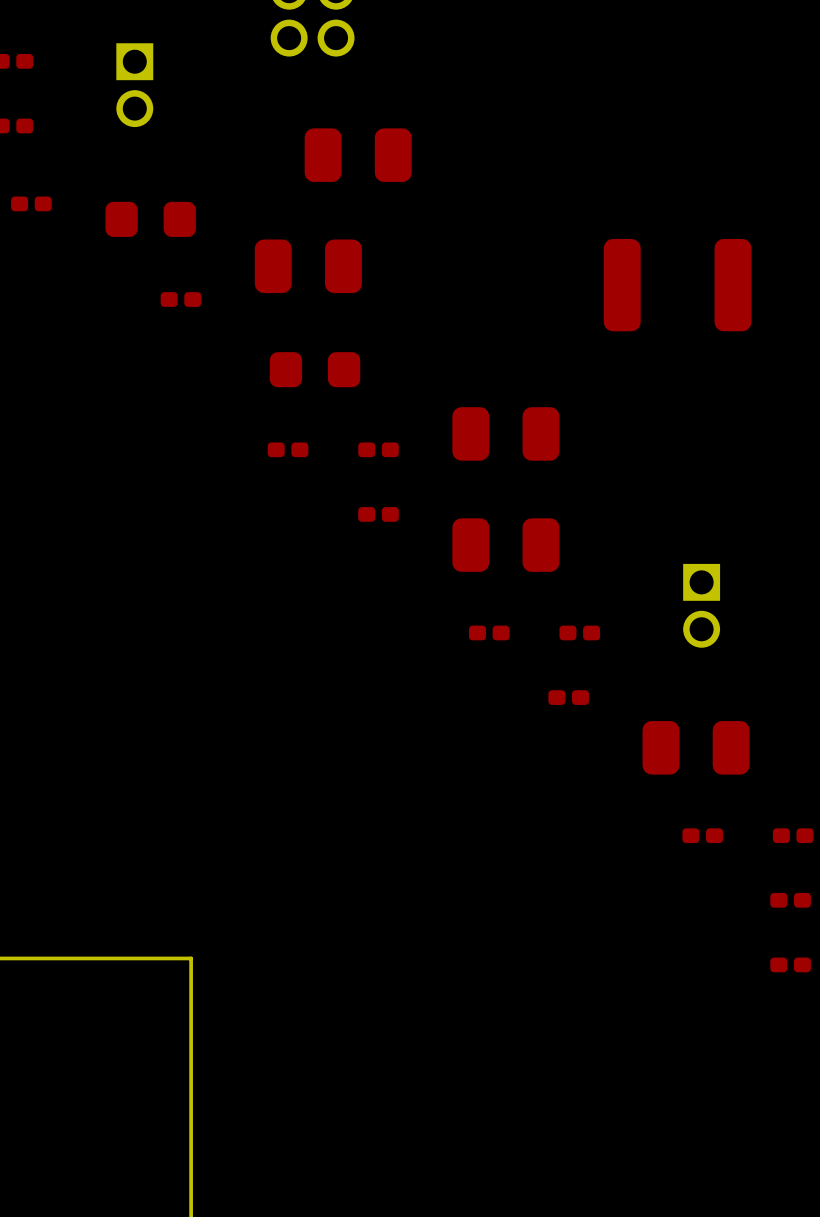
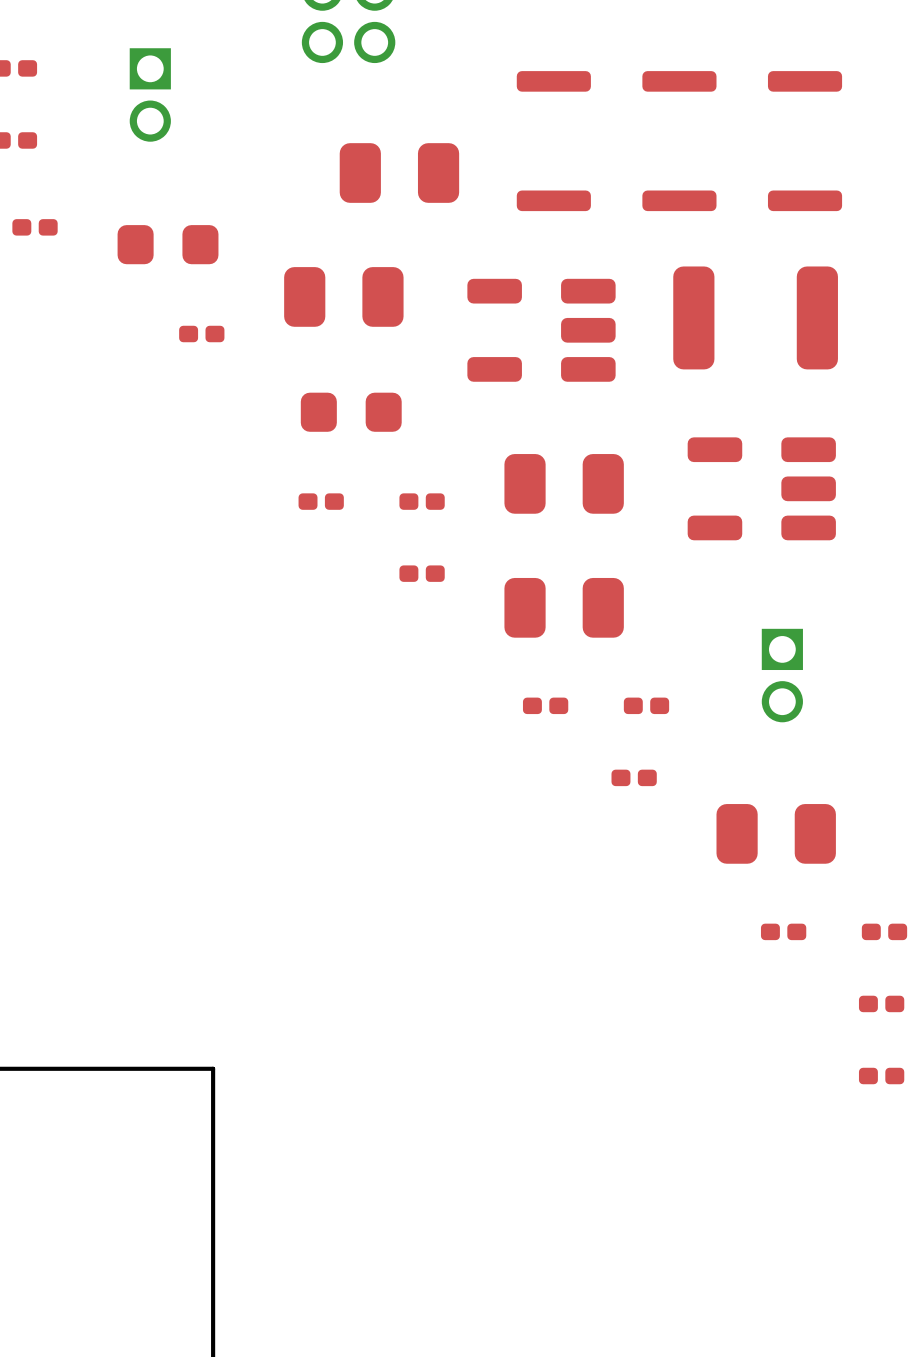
part: none -> (553, 141)
part: none -> (679, 141)
part: none -> (805, 141)
part: none -> (541, 330)
part: none -> (761, 488)

